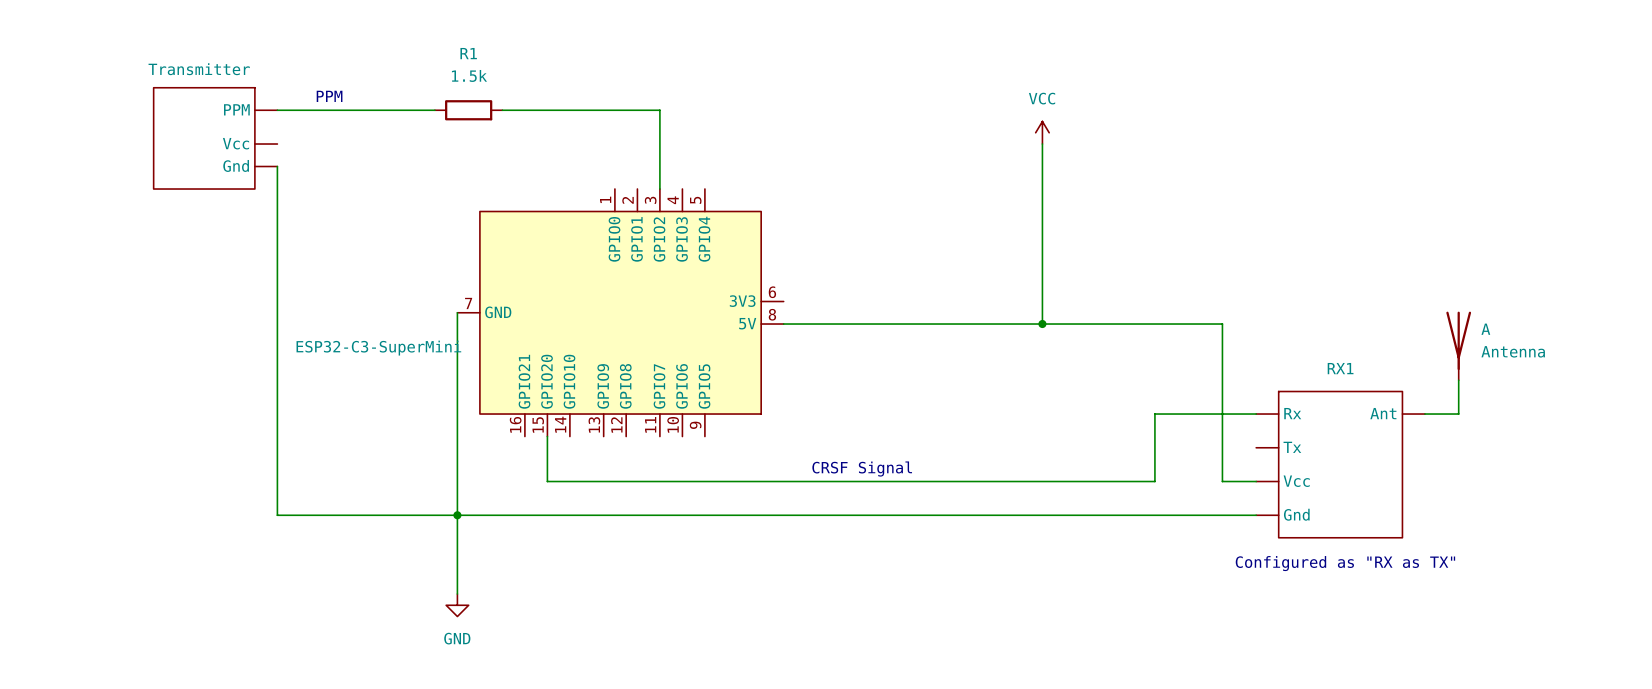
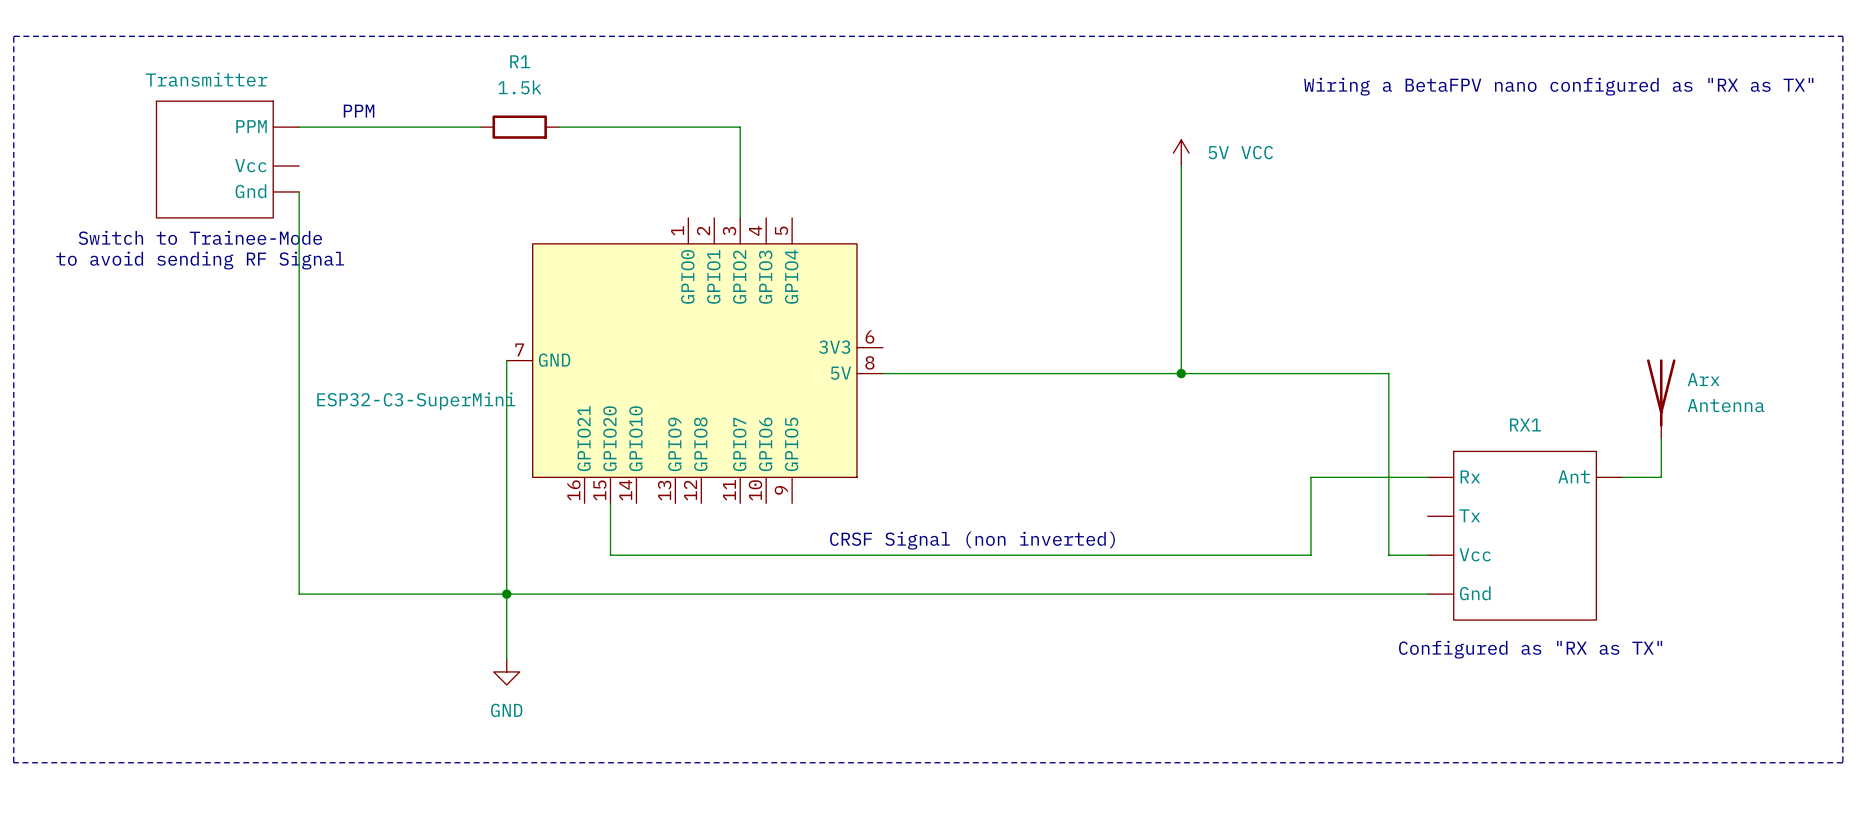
line: none -> (13, 36) (1842, 36) (1842, 762) (13, 762) (13, 36)
text: none -> Wiring a BetaFPV nano configured as "RX as TX" (1558, 86)
power symbol: VCC (1042, 132) -> 5V VCC (1181, 153)
text: none -> Switch to Trainee-Mode (200, 237)
text: none -> to avoid sending RF Signal (200, 260)
A name: A (1485, 329) -> Arx (1703, 379)
text: CRSF Signal (862, 469) -> CRSF Signal (non inverted) (972, 540)
power symbol position: GND (457, 605) -> GND (506, 671)

